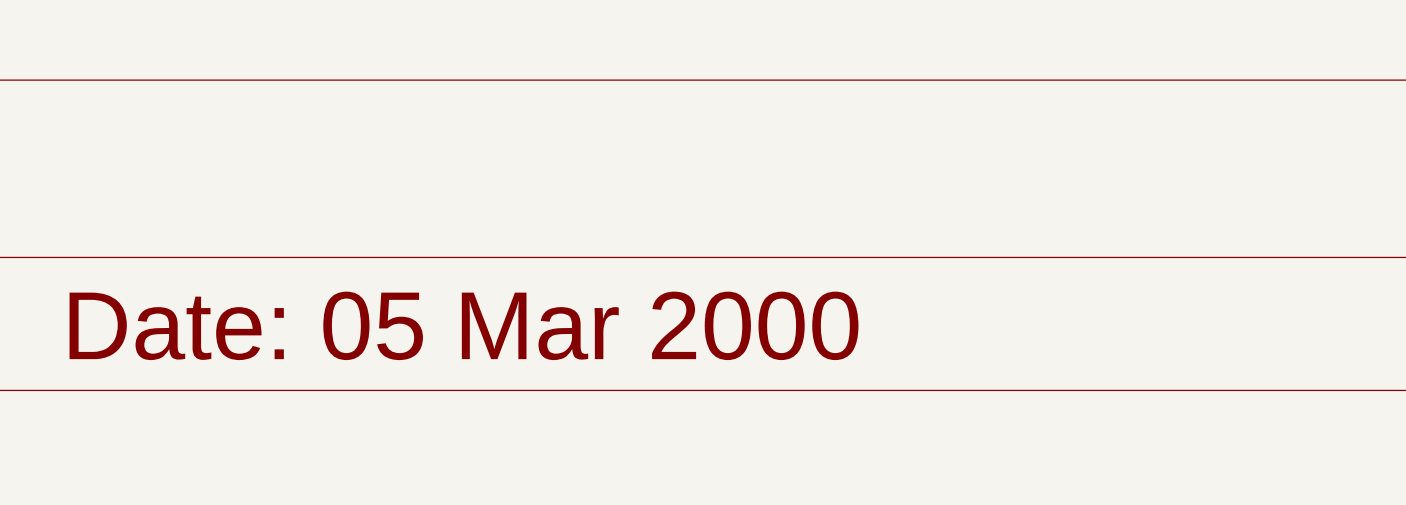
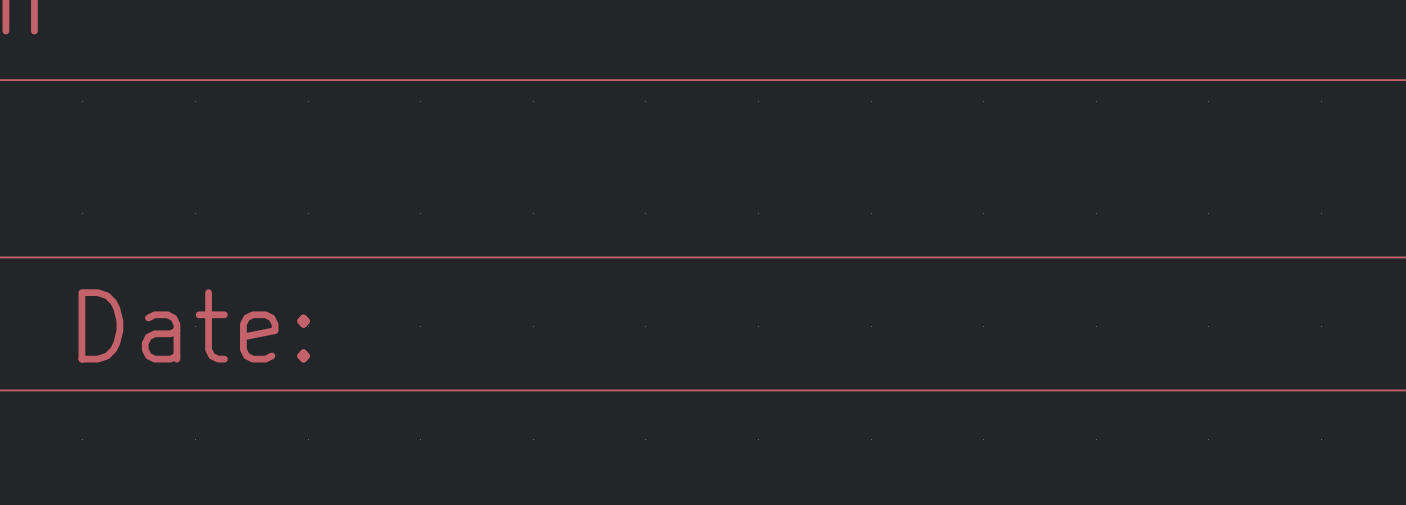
title block: Date: 05 Mar 2000 (464, 325) -> Date: (194, 325)

